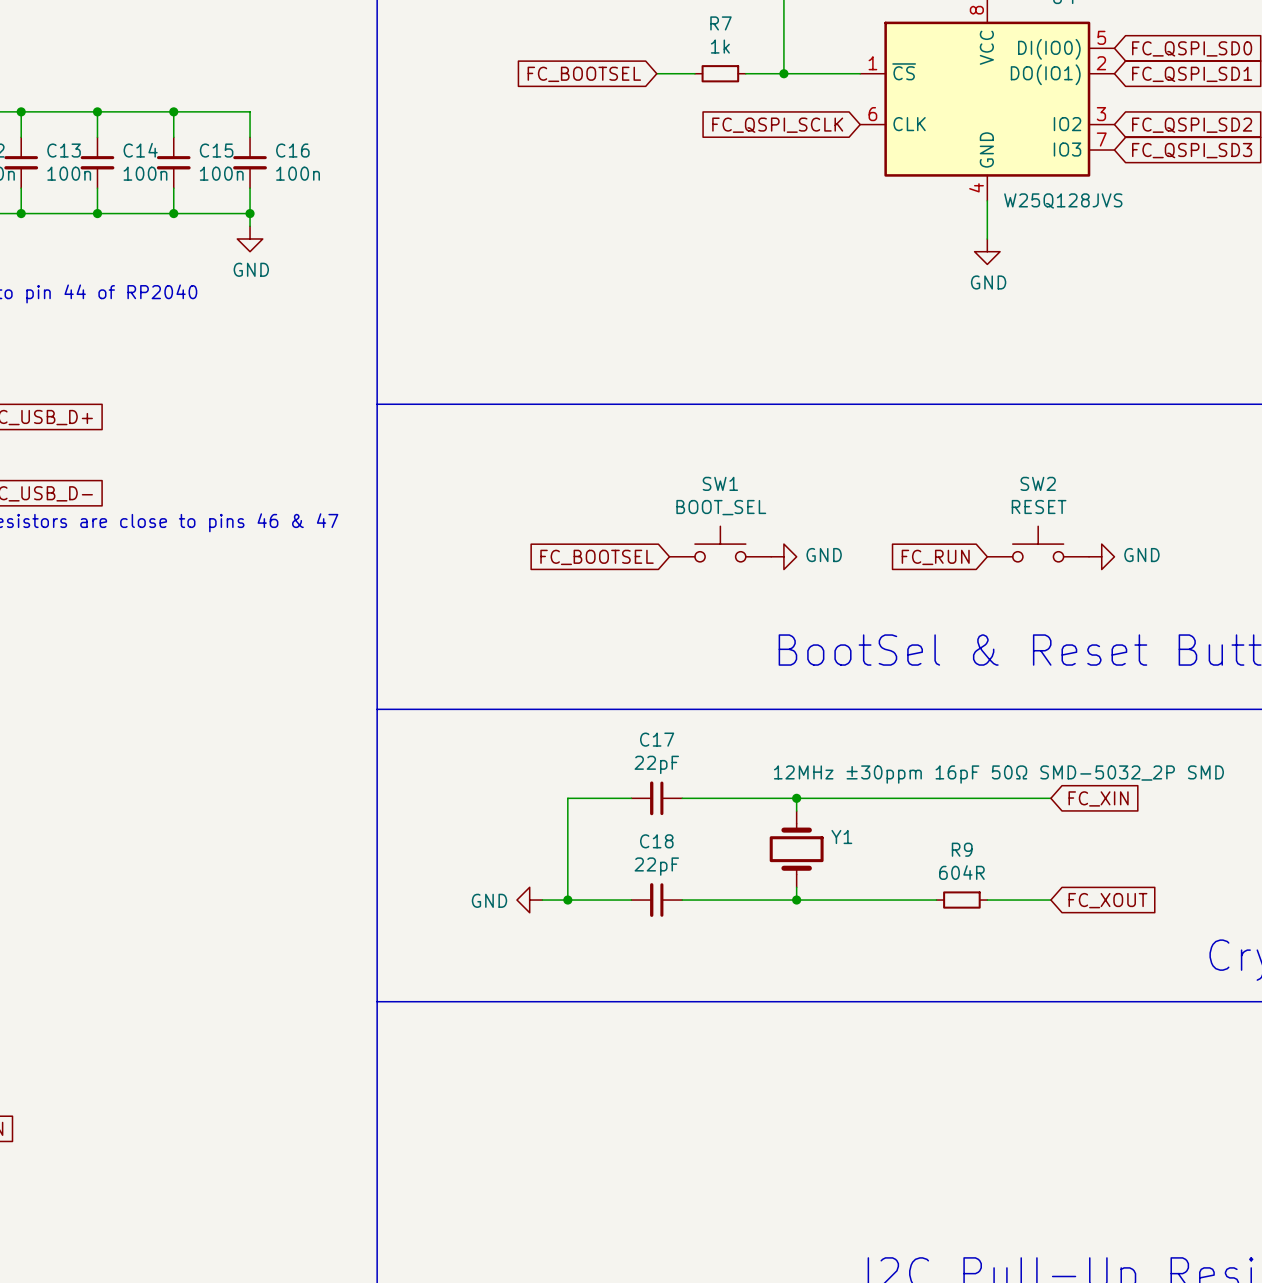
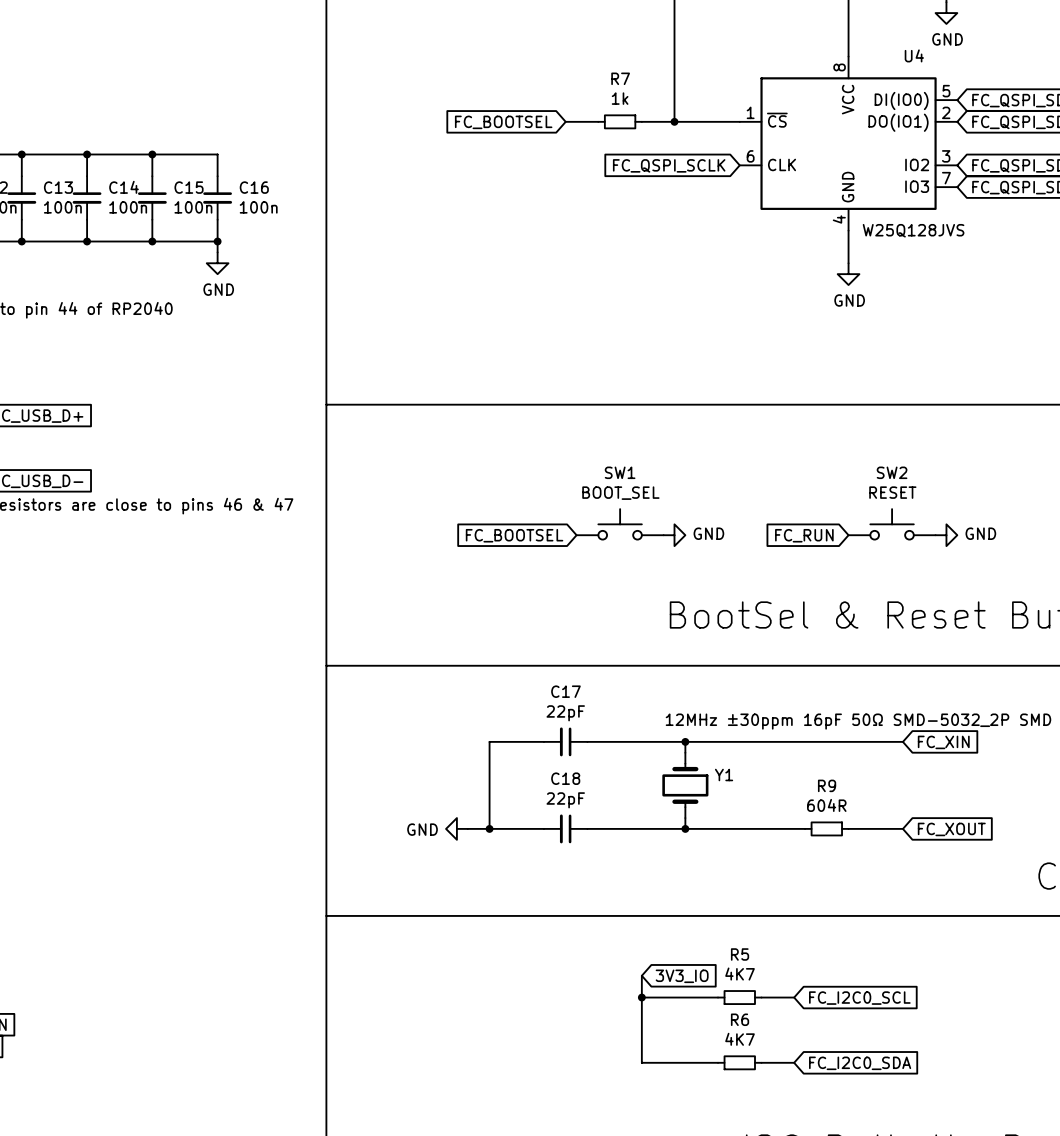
wire: none -> (641, 975) (641, 1062) (718, 1062)
global label: none -> 3V3_IO (682, 976)
wire: none -> (641, 997) (718, 997)
junction: none -> (641, 997)
R5: none -> 4K7 (739, 997)
wire: none -> (761, 997) (794, 997)
global label: none -> FC_I2C0_SCL (859, 998)
R6: none -> 4K7 (739, 1062)
wire: none -> (761, 1062) (794, 1062)
global label: none -> FC_I2C0_SDA (860, 1063)

